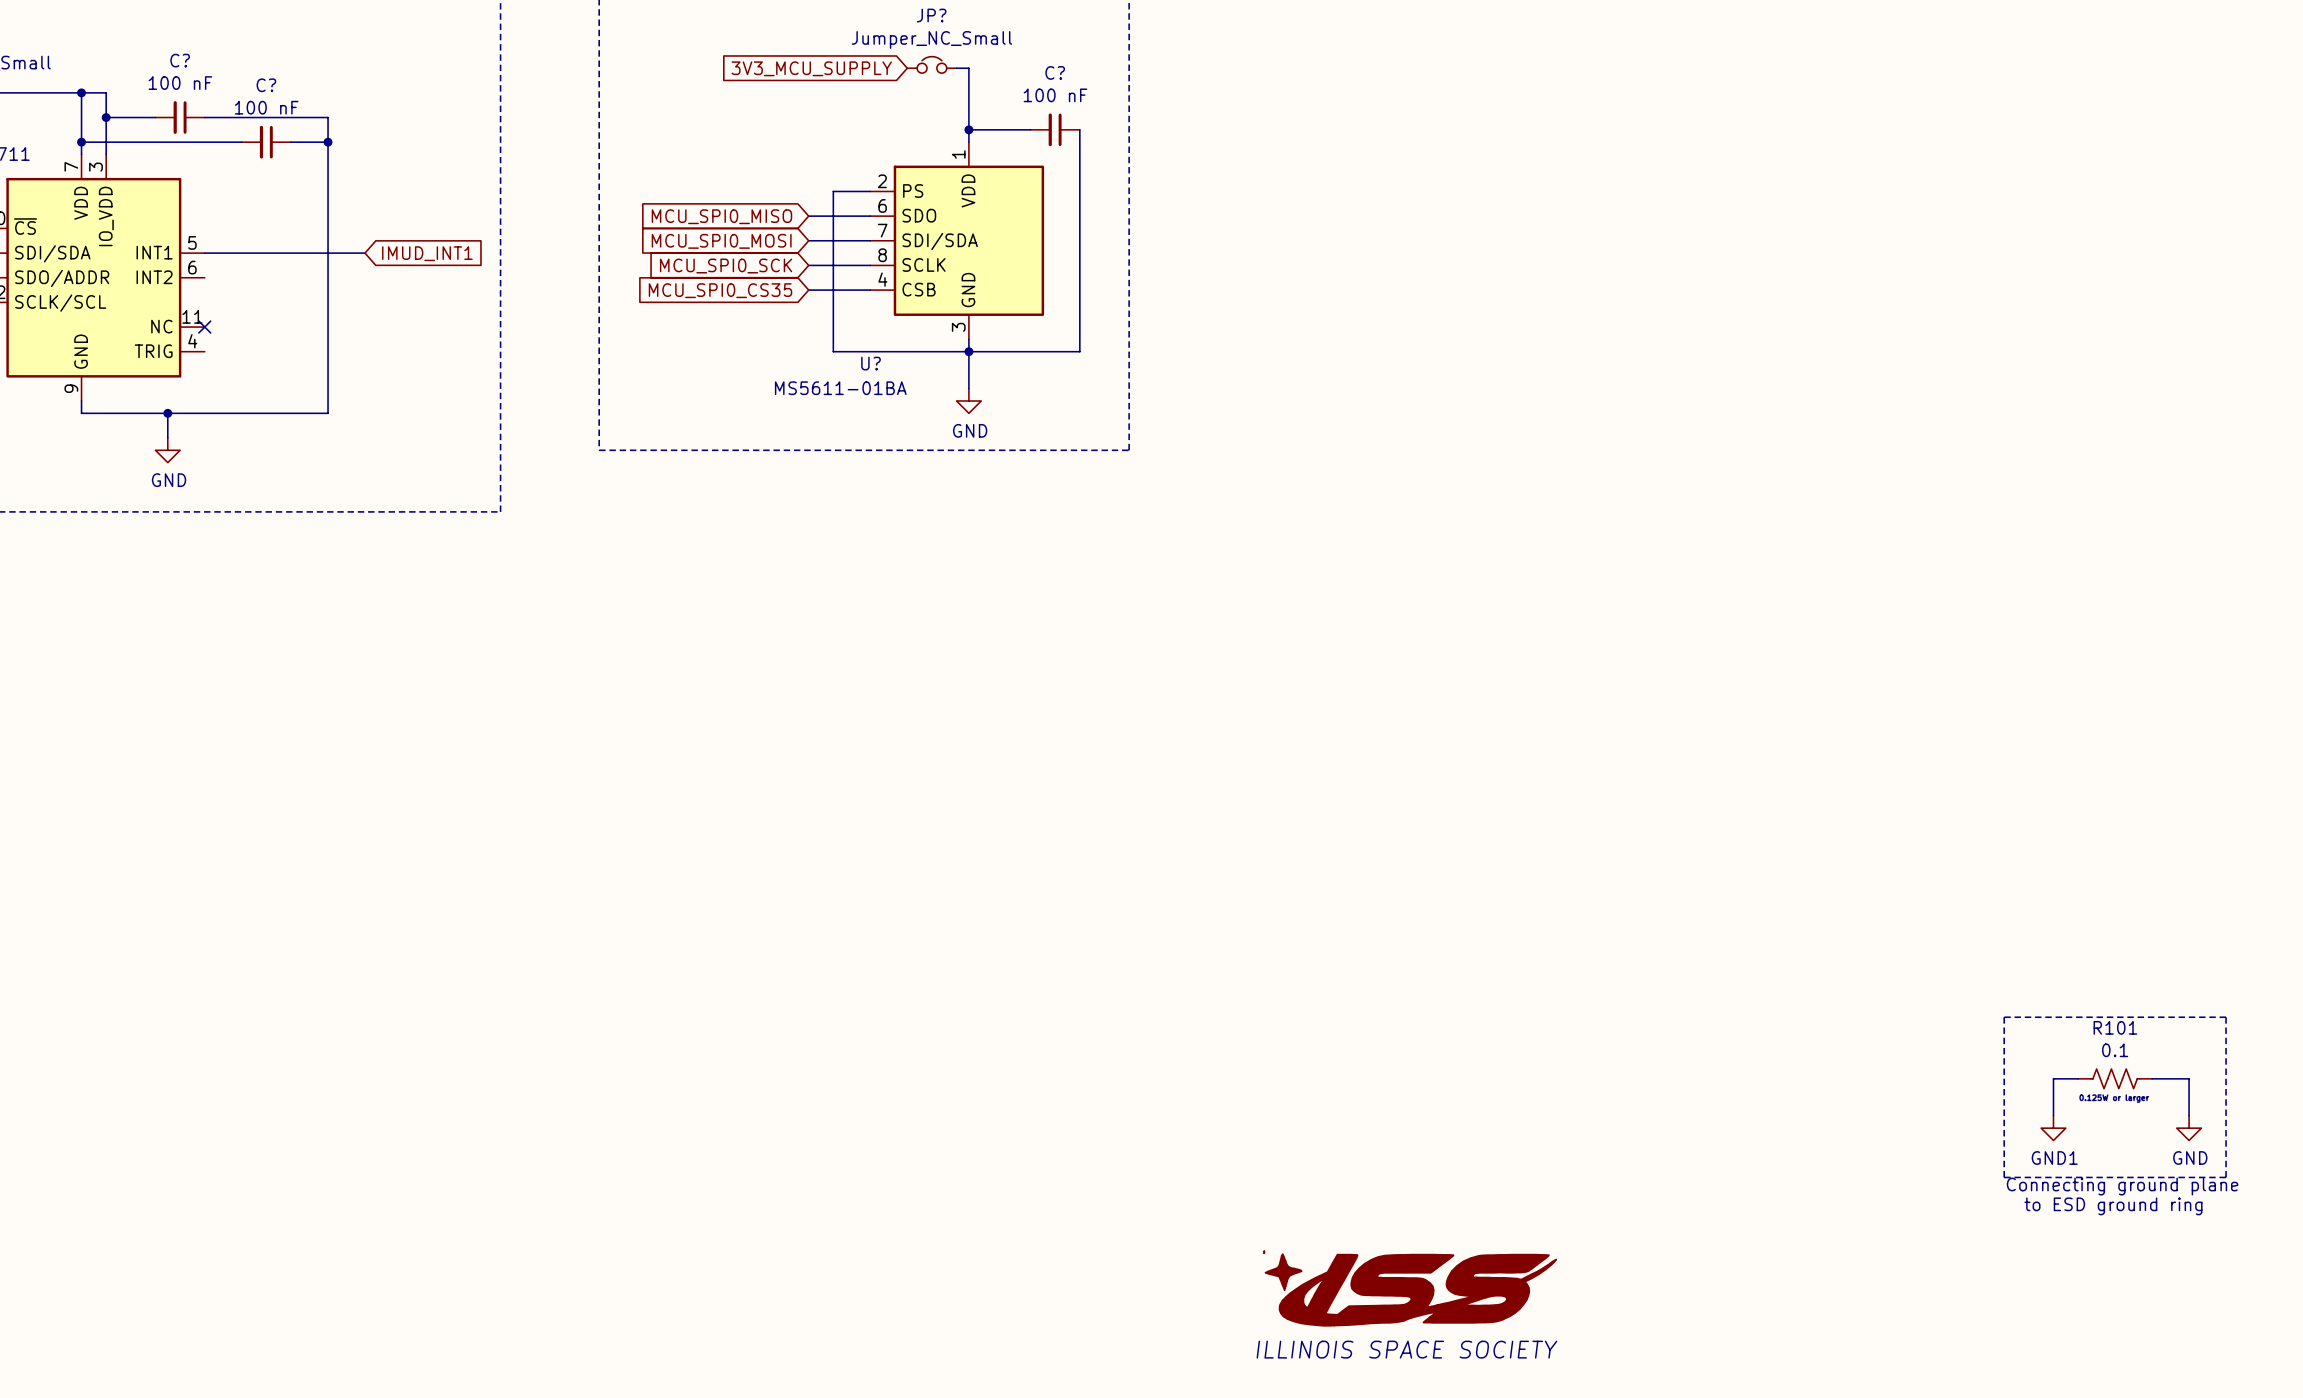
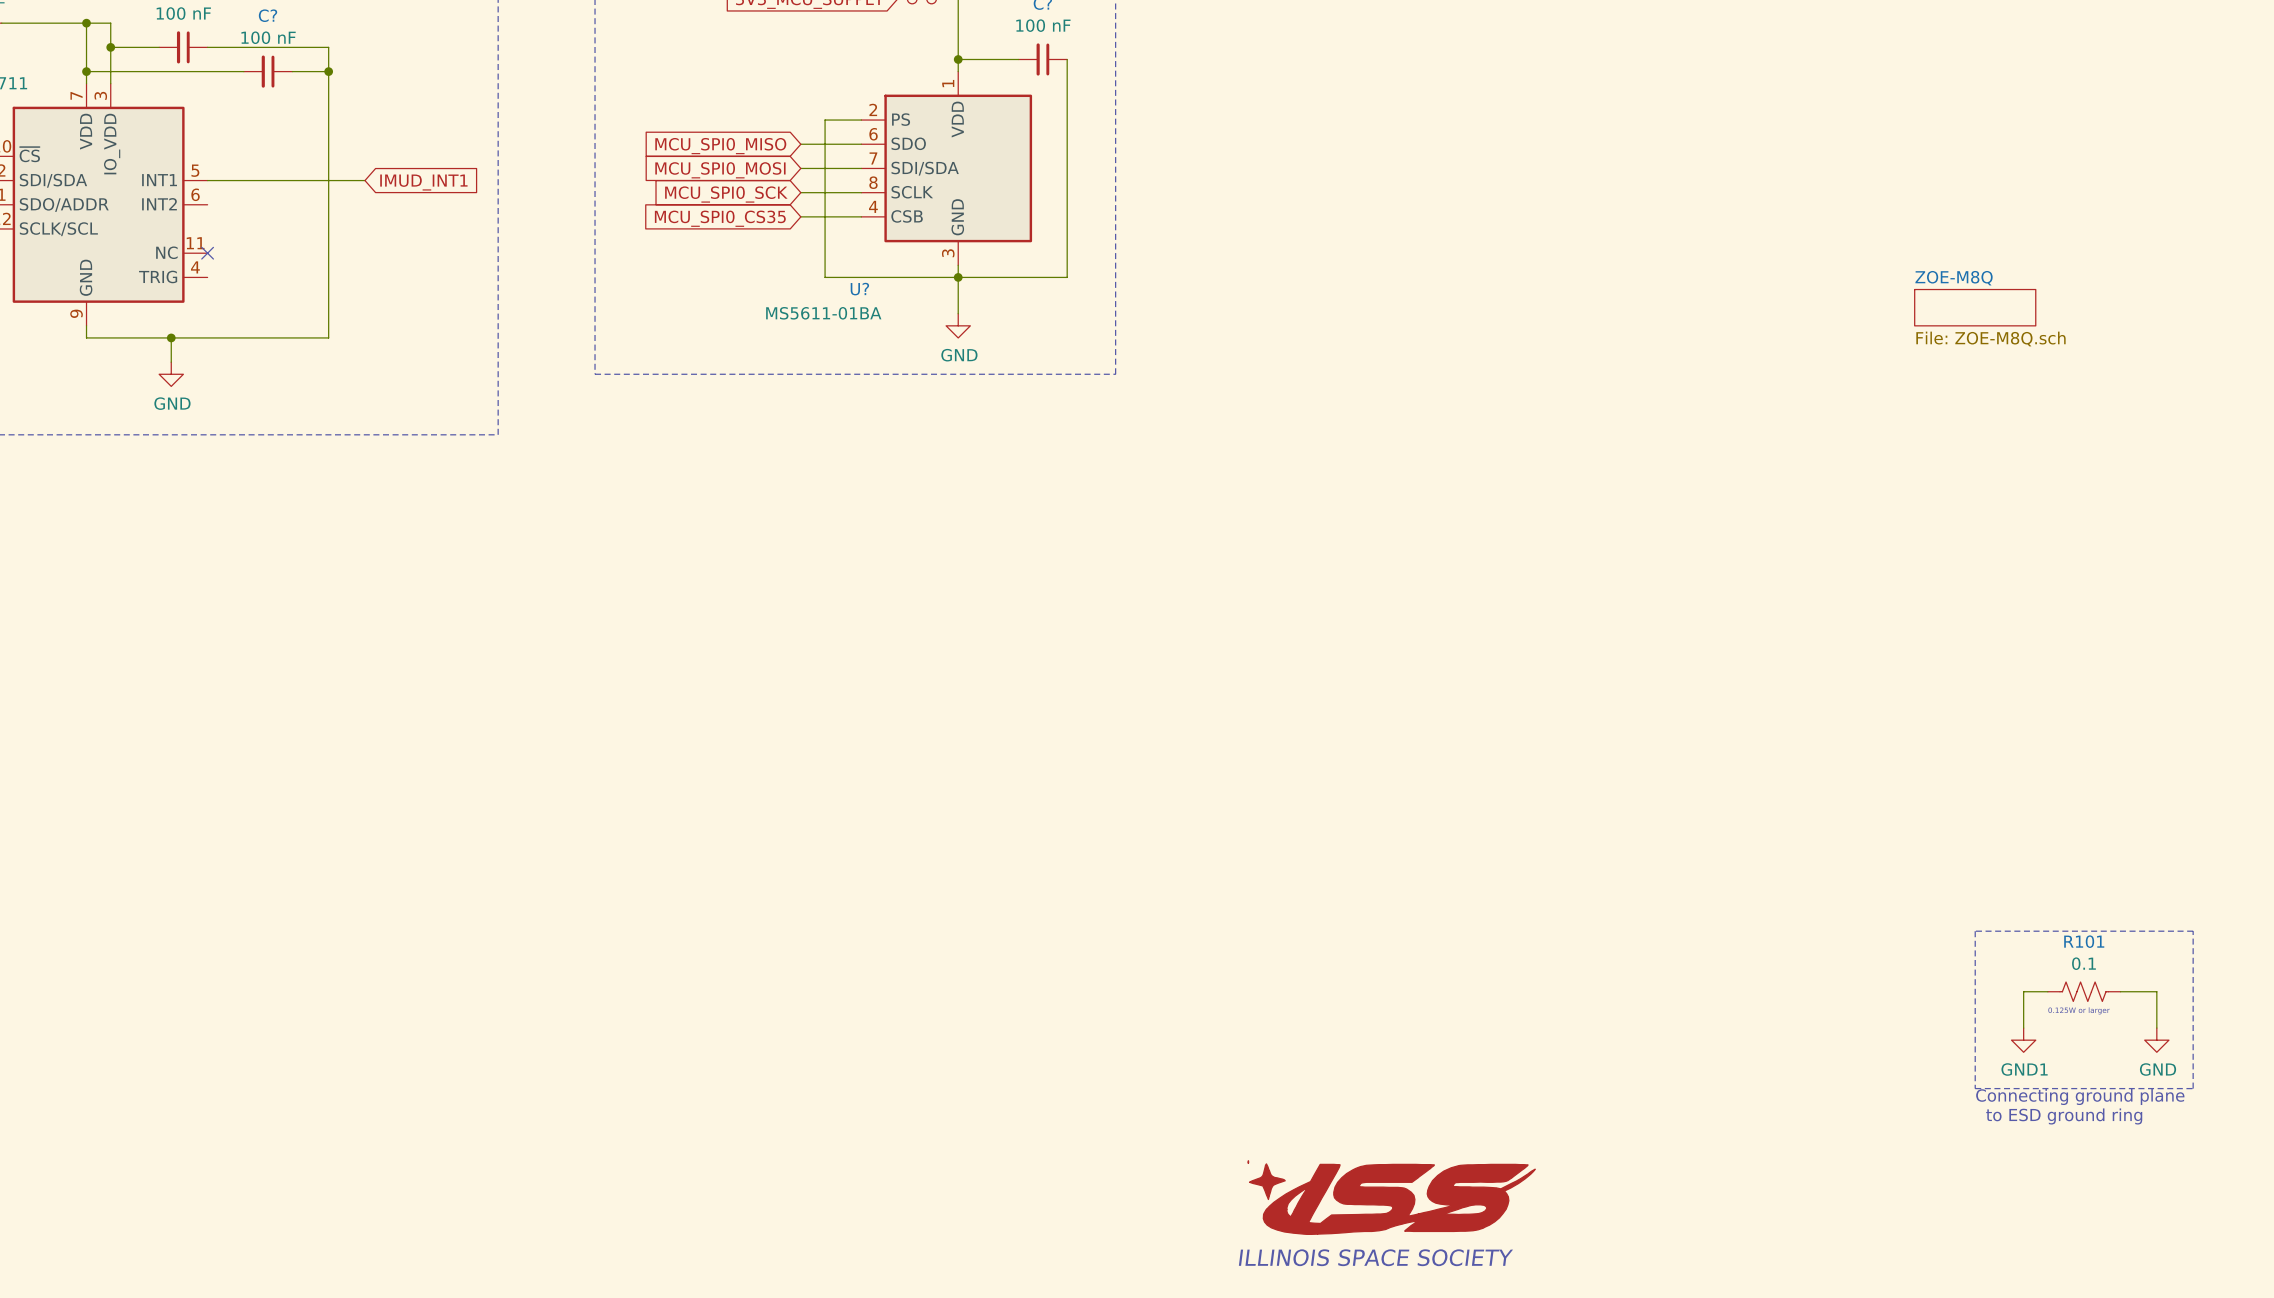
sheet ZOE-M8Q: none -> File: ZOE-M8Q.sch (1975, 307)

